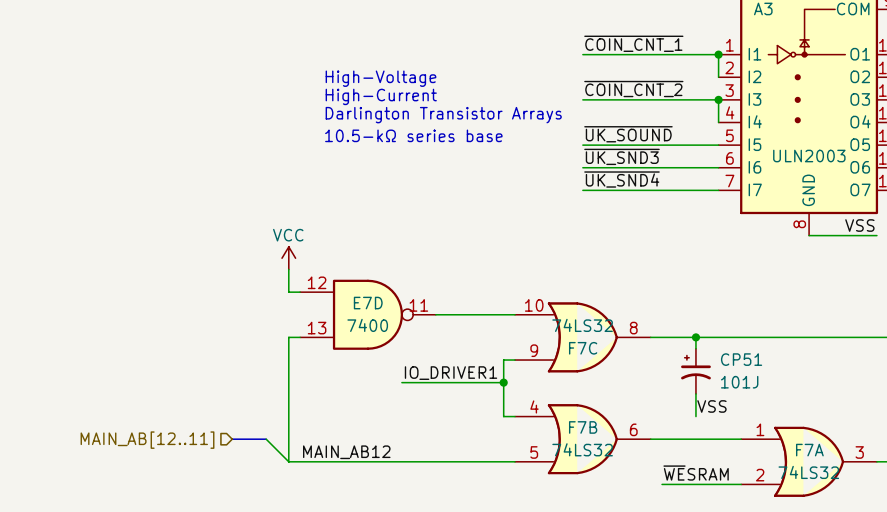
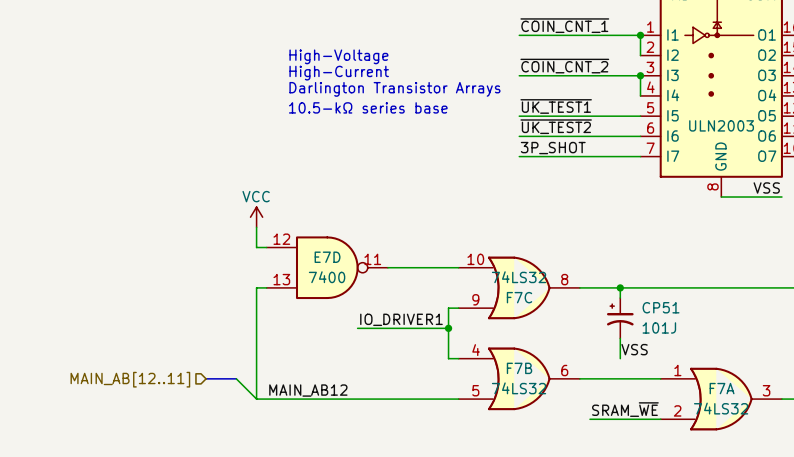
label: ~{UK_SOUND} (628, 134) -> ~{UK_TEST1} (556, 106)
label: ~{UK_SND3} (622, 156) -> ~{UK_TEST2} (556, 126)
label: ~{UK_SND4} (622, 179) -> 3P_SHOT (553, 148)
label: ~{WE}SRAM (696, 473) -> SRAM_~{WE} (625, 409)

